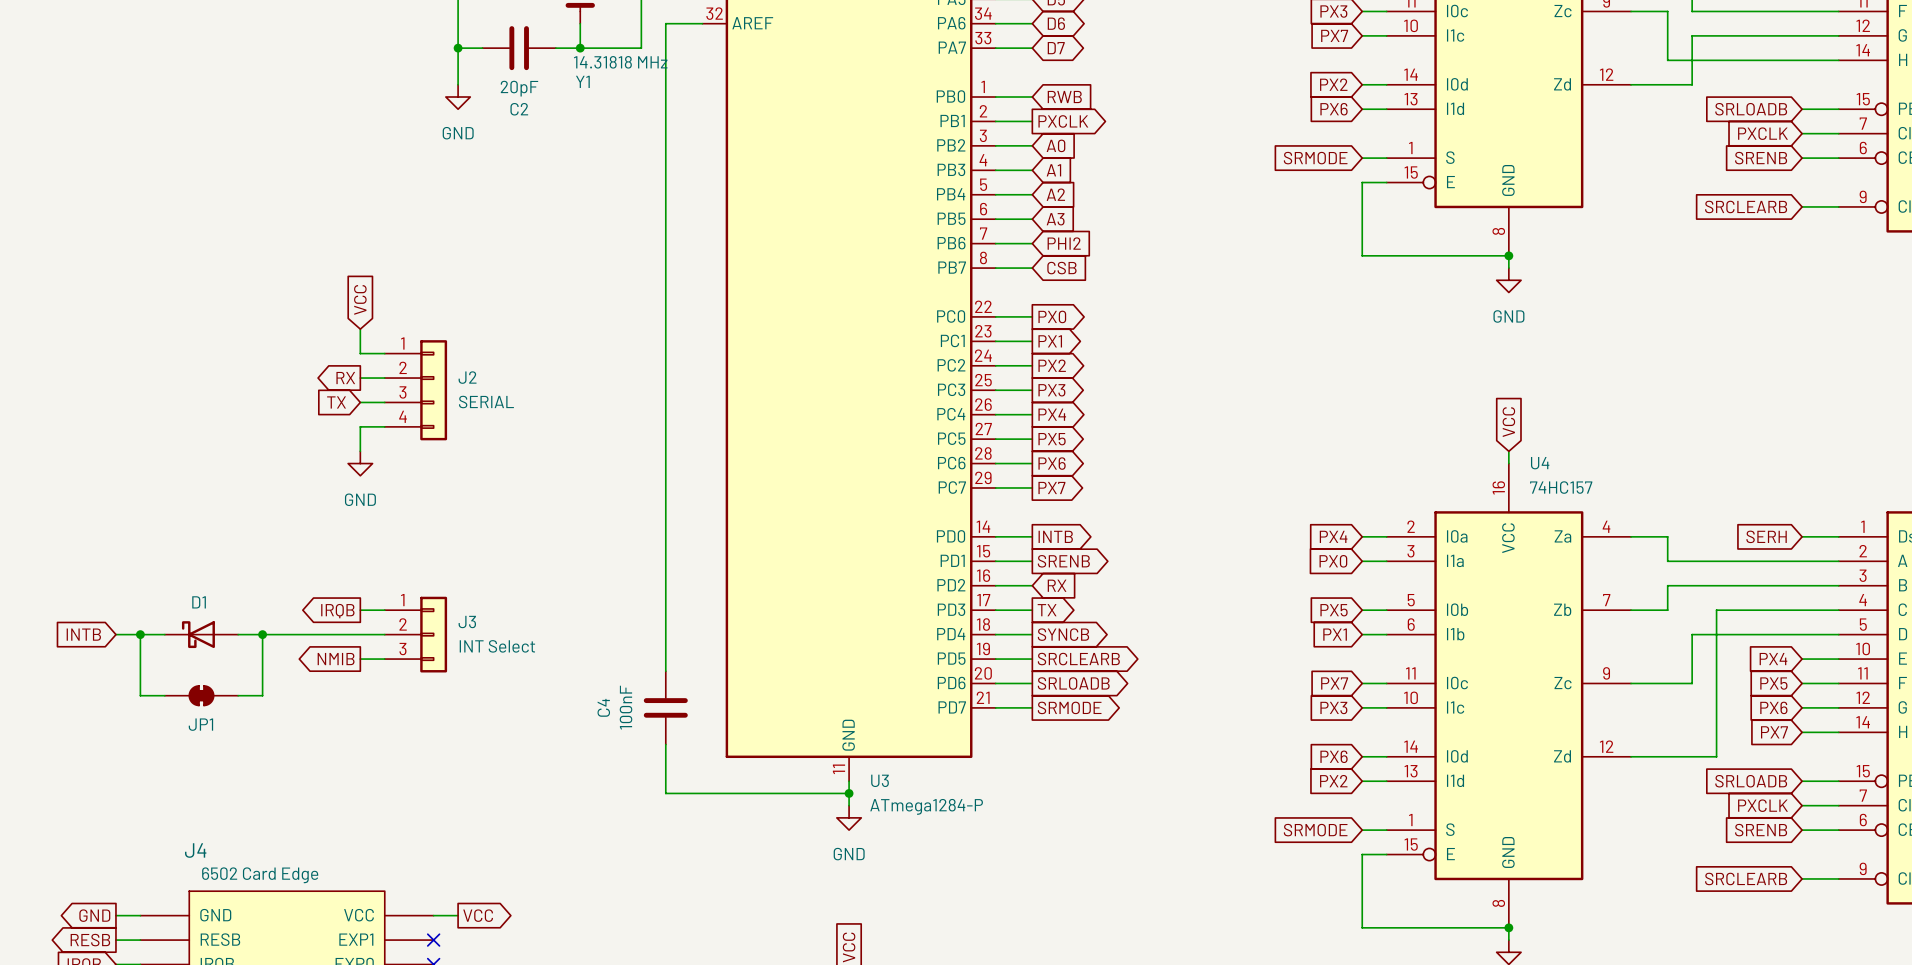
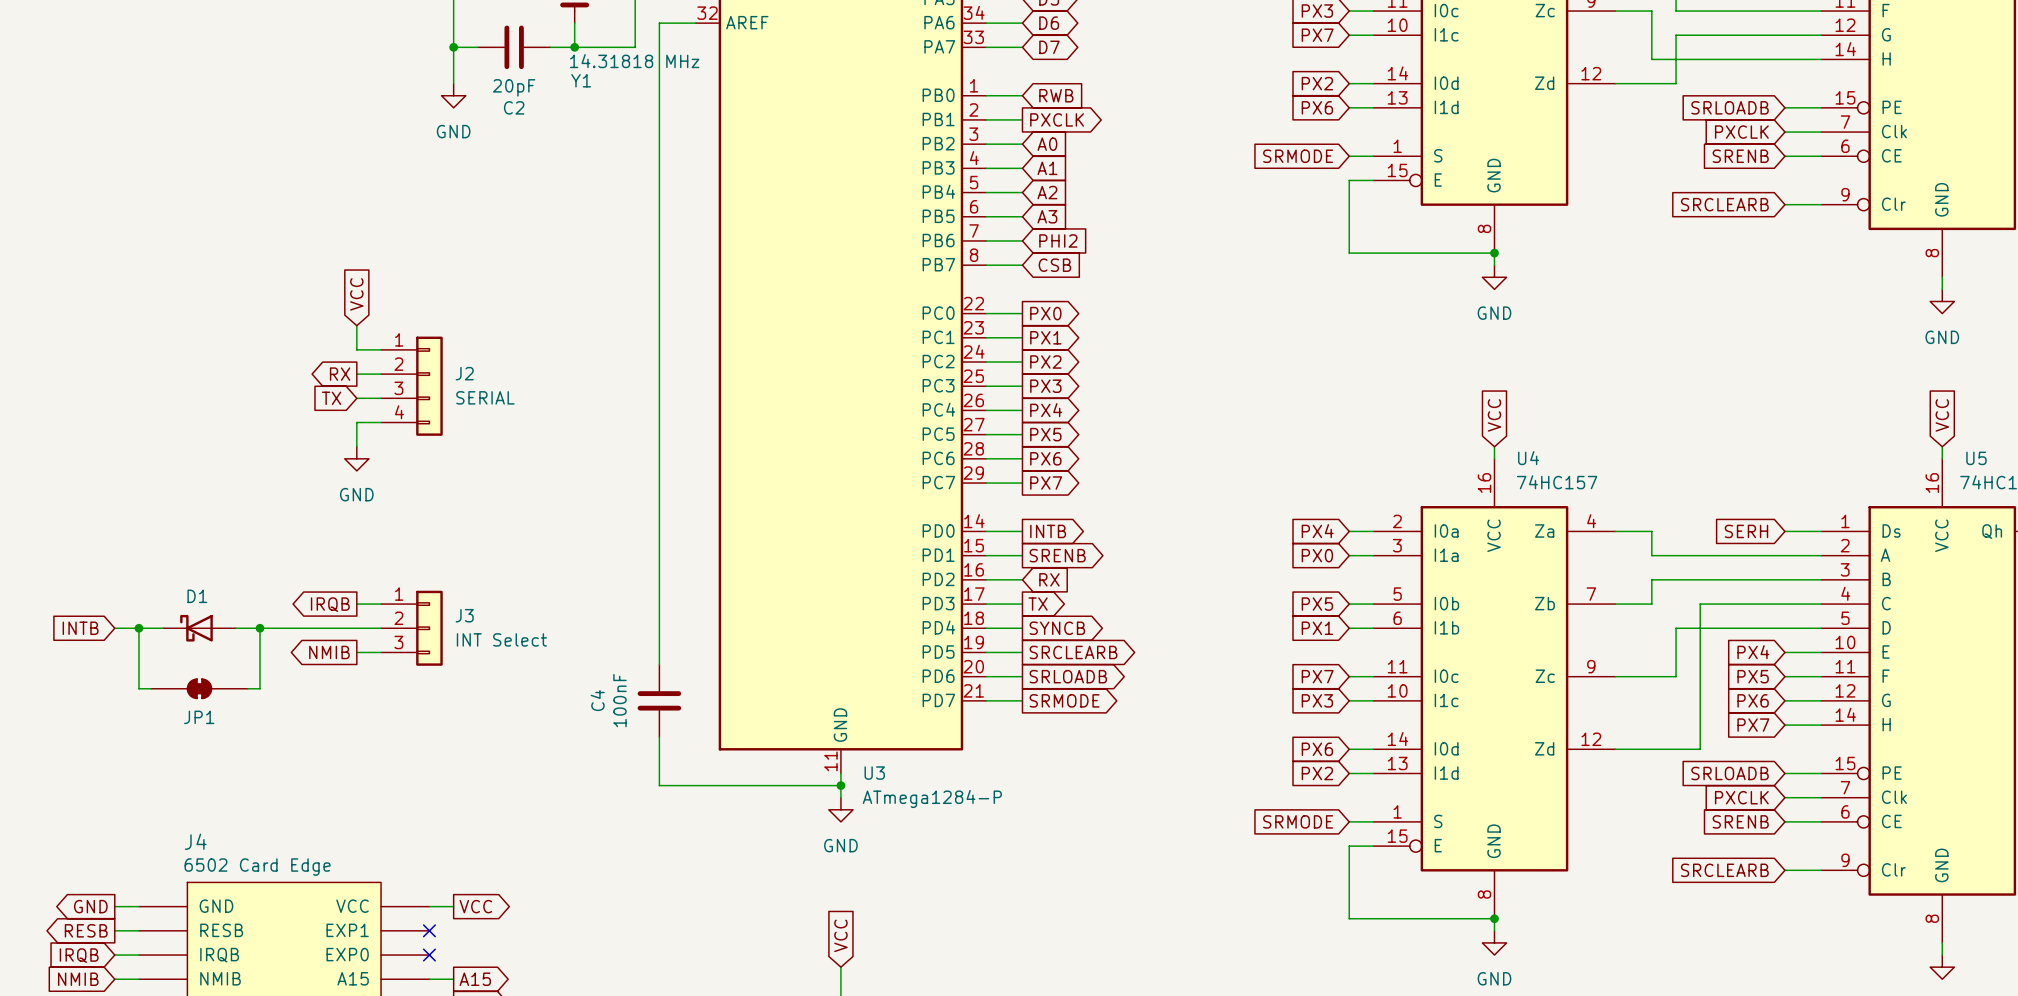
JP1 symbol: [164, 685, 239, 706] -> [151, 678, 248, 700]

